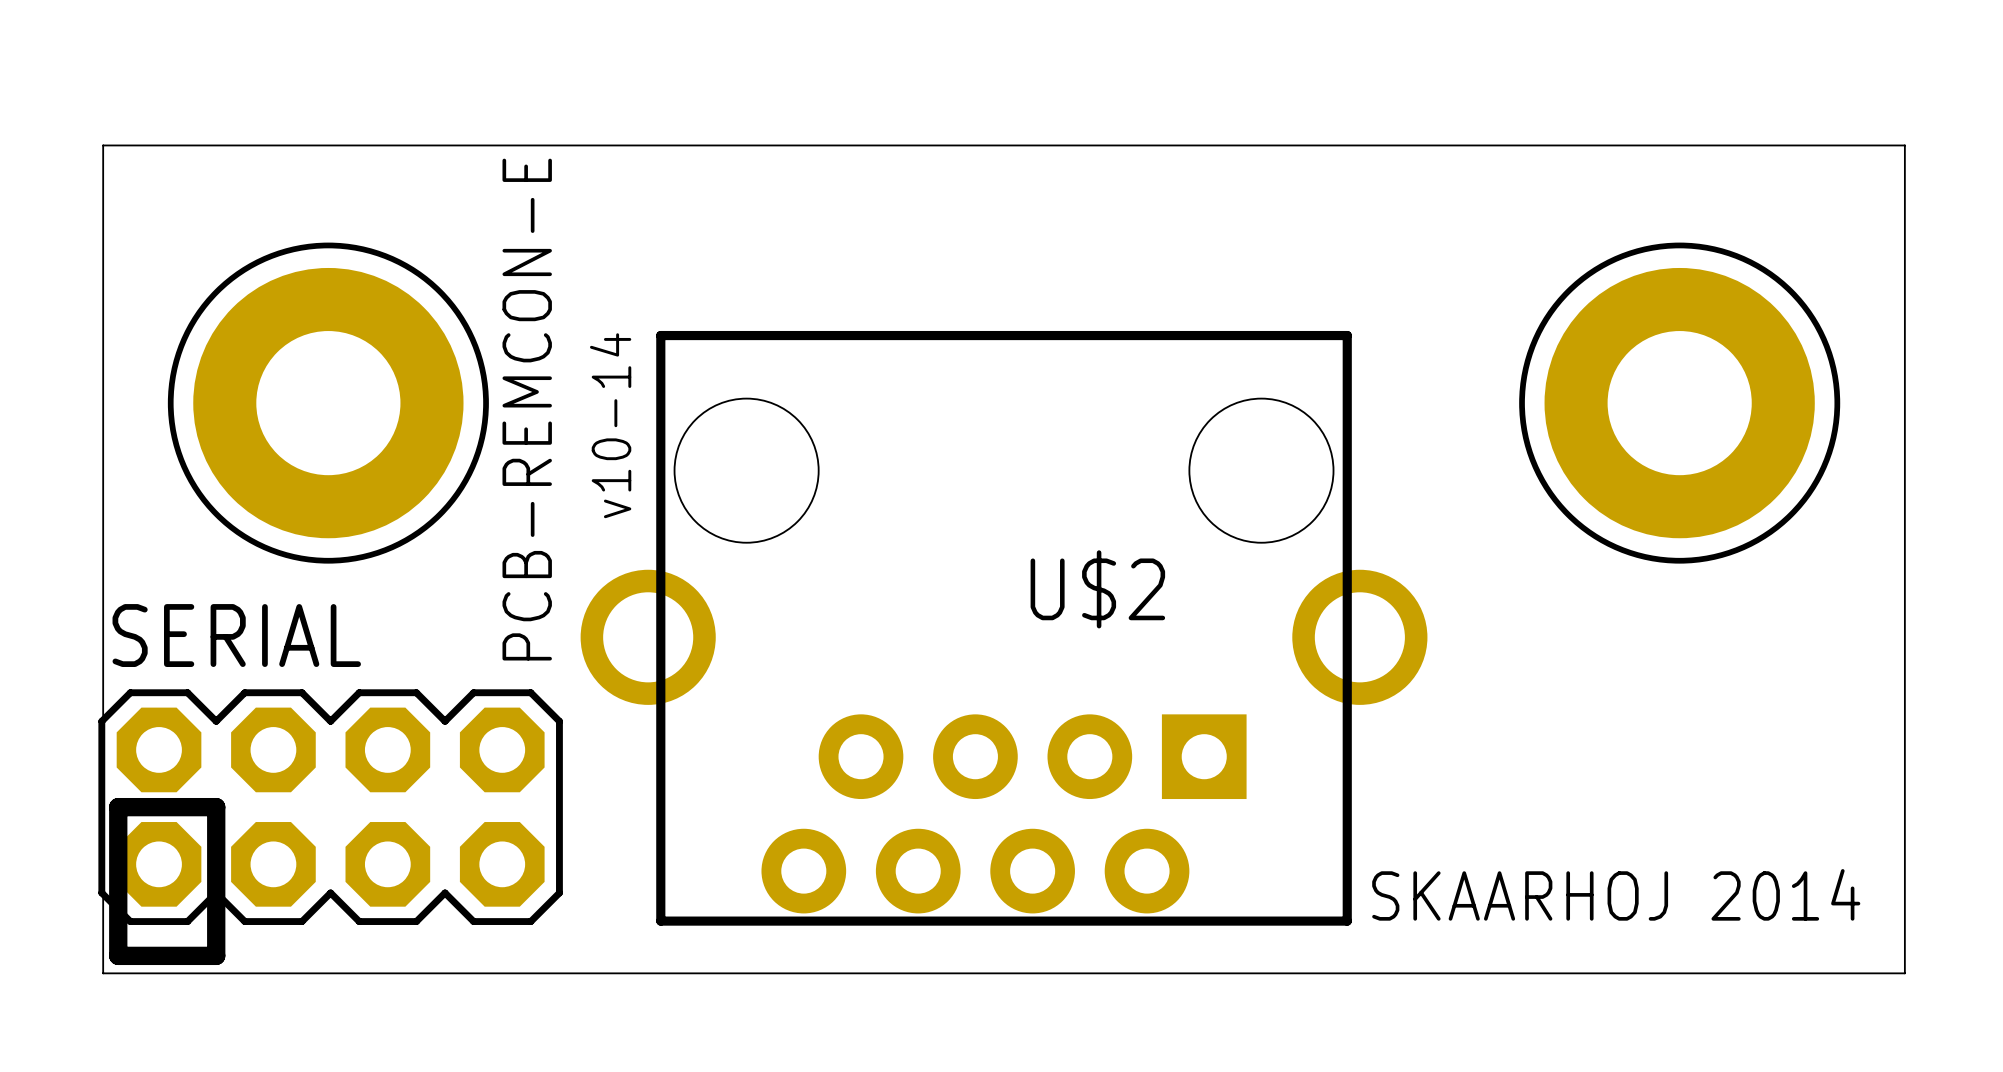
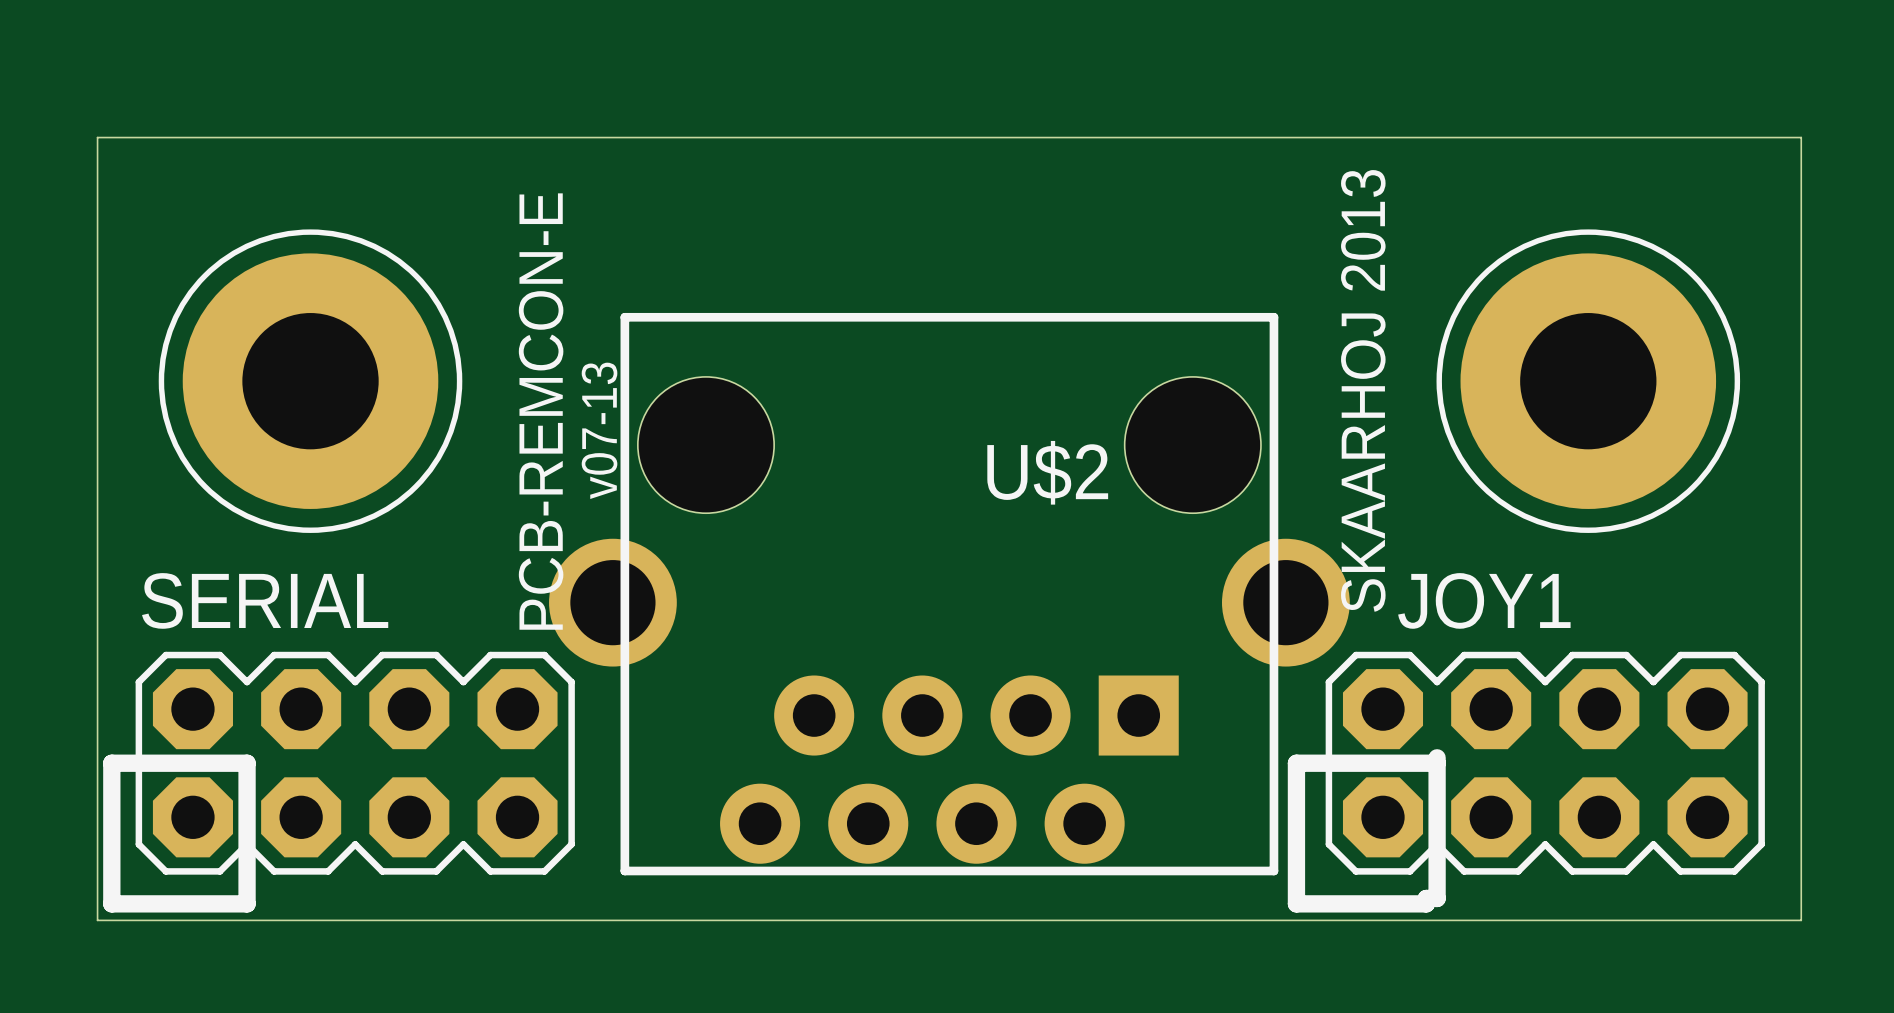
text position: PCB-REMCON-E (527, 409) -> PCB-REMCON-E (541, 411)
text: none -> SKAARHOJ 2013 (1363, 390)
text: v10-14 (610, 425) -> v07-13 (599, 430)
U$2 name position: U$2 (1097, 589) -> U$2 (1047, 472)
line: none -> (1437, 757) (1437, 898) (1426, 898) (1426, 903) (1296, 903) (1296, 763) (1437, 763)
line: (216, 807) (216, 955) -> (204, 763) (247, 763) (247, 903) (204, 903)
SERIAL position: (330, 807) -> (355, 763)
JOY1: none -> (1545, 763)
text: SKAARHOJ 2014 (1616, 894) -> none

